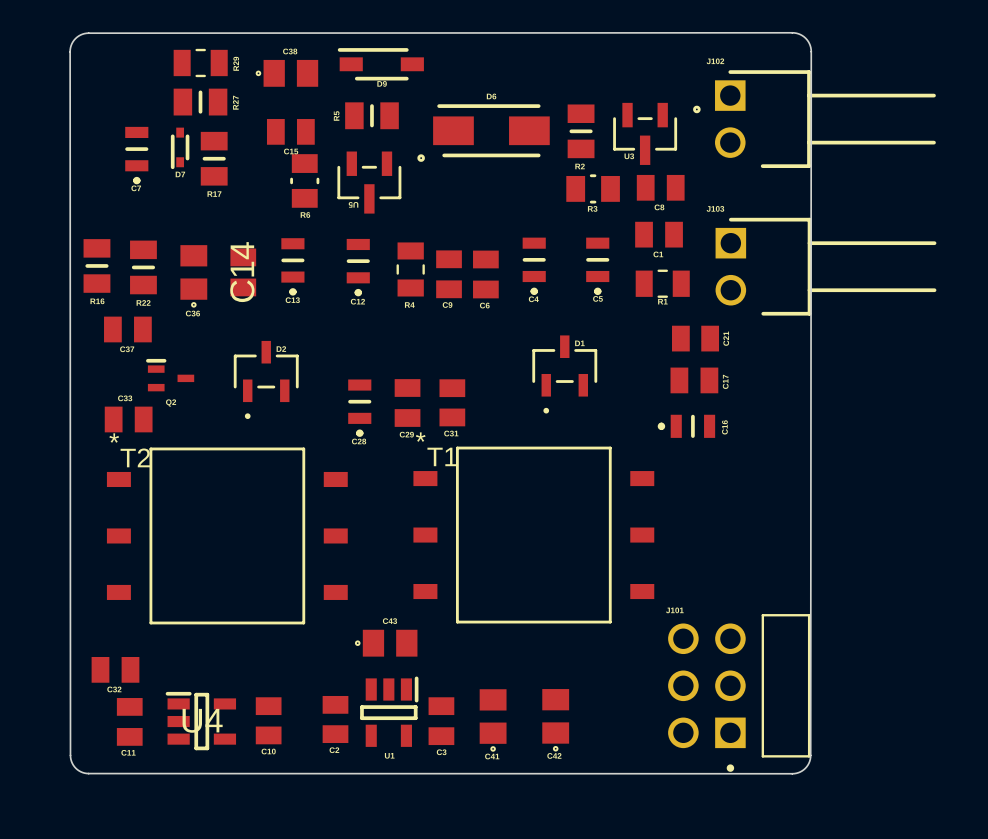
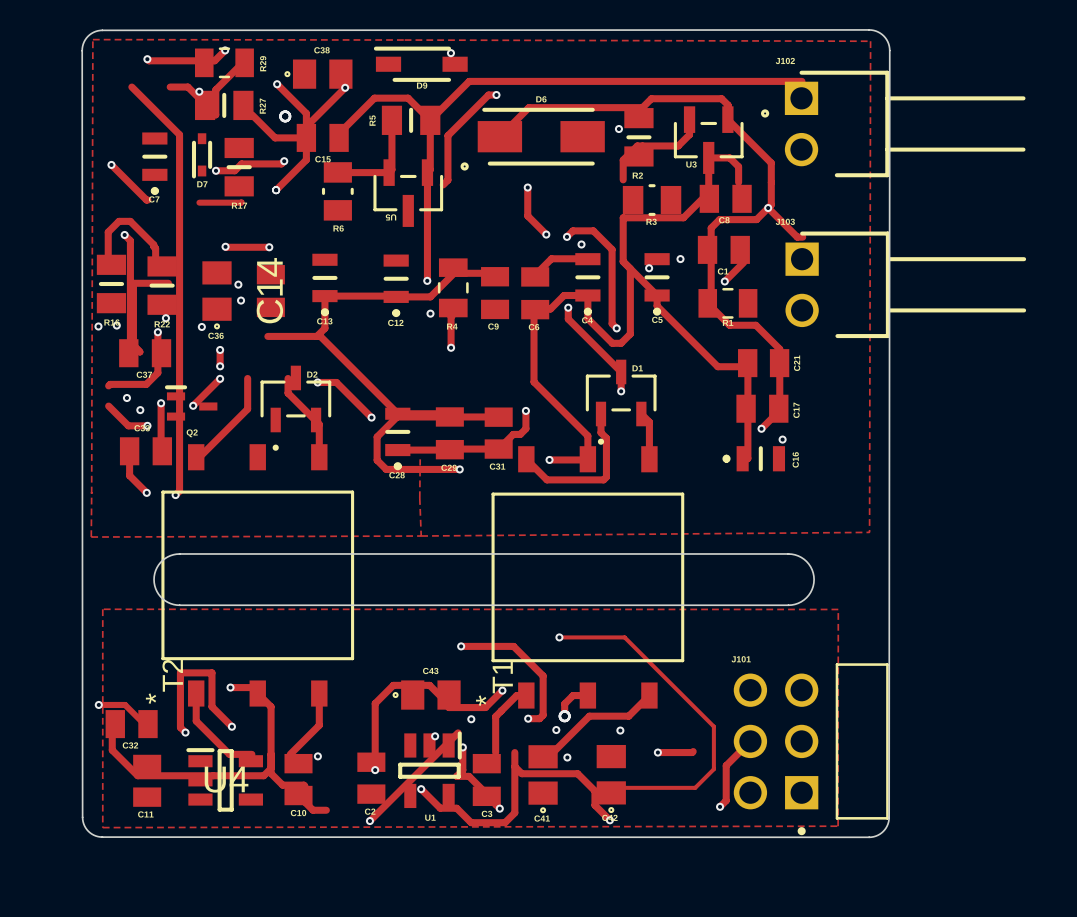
track: none -> (225, 50) (214, 60) (148, 60) (147, 59)
via: none -> (225, 50)
via: none -> (450, 53)
via: none -> (147, 59)
track: none -> (244, 60) (215, 89) (215, 114) (187, 87) (170, 87)
track: none -> (801, 81) (469, 81) (430, 120)
track: none -> (277, 84) (306, 113) (306, 159) (276, 190)
via: none -> (277, 84)
track: none -> (131, 87) (179, 134) (179, 491) (175, 495)
track: none -> (345, 87) (306, 126)
via: none -> (345, 87)
via: none -> (199, 91)
track: none -> (496, 95) (488, 95) (447, 135) (447, 180) (443, 184)
via: none -> (496, 95)
track: none -> (728, 105) (721, 98) (651, 98) (642, 107) (528, 107) (499, 136)
track: none -> (727, 105) (727, 119) (771, 163) (771, 204) (756, 219) (719, 219) (711, 228) (711, 299) (707, 303) (729, 325) (755, 325) (779, 349) (780, 409) (761, 428)
track: none -> (252, 114) (275, 137) (306, 137)
via: none -> (285, 116)
track: none -> (391, 120) (391, 169) (389, 172) (338, 172)
track: none -> (430, 120) (430, 169) (427, 172) (427, 280)
track: none -> (430, 120) (408, 98) (374, 98) (339, 133) (339, 137)
track: none -> (689, 119) (689, 134) (678, 145) (637, 145) (623, 160) (623, 179)
via: none -> (618, 129)
track: none -> (284, 161) (281, 163) (241, 163) (234, 170) (215, 170)
via: none -> (284, 161)
track: none -> (111, 164) (147, 200)
via: none -> (111, 164)
via: none -> (215, 170)
track: none -> (738, 182) (738, 166) (729, 157) (708, 157) (708, 192) (683, 217) (623, 217) (623, 261) (657, 295) (657, 305) (717, 366) (747, 366) (747, 458)
track: none -> (527, 187) (527, 215) (546, 234)
via: none -> (527, 187)
via: none -> (276, 190)
track: none -> (241, 202) (199, 202)
track: none -> (768, 208) (797, 237) (802, 237)
via: none -> (768, 208)
track: none -> (124, 234) (130, 240) (130, 342) (139, 352)
via: none -> (124, 234)
via: none -> (546, 234)
track: none -> (566, 236) (573, 230) (593, 230) (612, 249) (612, 323) (616, 328)
via: none -> (566, 236)
via: none -> (581, 244)
track: none -> (225, 246) (269, 247)
via: none -> (225, 246)
via: none -> (269, 247)
track: none -> (587, 258) (551, 258) (534, 276)
via: none -> (680, 259)
track: none -> (743, 262) (724, 281)
track: none -> (108, 264) (108, 232) (119, 221) (130, 221) (153, 244) (155, 265)
track: none -> (630, 268) (630, 334) (621, 343) (612, 343) (587, 318) (587, 295) (564, 295) (550, 309) (534, 309) (534, 382) (587, 435) (587, 459) (549, 459)
via: none -> (649, 268)
track: none -> (495, 276) (491, 273) (454, 273) (430, 296) (324, 296) (324, 328) (316, 336)
via: none -> (427, 280)
via: none -> (724, 281)
track: none -> (168, 283) (133, 283) (133, 345)
via: none -> (238, 284)
via: none -> (241, 300)
track: none -> (568, 307) (568, 319) (621, 371) (621, 391)
via: none -> (568, 307)
via: none -> (430, 313)
track: none -> (454, 313) (451, 316) (451, 347)
via: none -> (165, 318)
via: none -> (98, 326)
via: none -> (116, 325)
via: none -> (201, 326)
via: none -> (616, 328)
track: none -> (157, 332) (157, 372) (146, 384) (108, 385)
via: none -> (157, 332)
track: none -> (267, 336) (320, 336) (397, 413) (446, 413) (449, 416)
via: none -> (451, 347)
track: none -> (220, 349) (220, 366)
via: none -> (220, 349)
via: none -> (220, 366)
track: none -> (247, 378) (247, 409) (199, 457) (196, 457)
track: none -> (288, 378) (288, 393) (319, 424) (319, 457)
track: none -> (220, 378) (193, 405)
via: none -> (220, 378)
track: none -> (317, 382) (336, 382) (371, 417)
via: none -> (317, 382)
via: none -> (621, 391)
via: none -> (126, 398)
track: none -> (161, 403) (162, 451)
via: none -> (161, 403)
via: none -> (193, 405)
track: none -> (108, 406) (128, 425) (147, 425)
via: none -> (140, 410)
track: none -> (525, 410) (525, 428) (520, 434) (513, 434) (498, 449) (397, 450)
via: none -> (525, 410)
track: none -> (601, 414) (601, 432) (606, 438) (606, 477) (603, 479) (546, 479) (526, 459)
track: none -> (641, 414) (649, 422) (649, 459)
via: none -> (371, 417)
track: none -> (498, 416) (397, 416) (377, 436) (377, 460) (386, 469) (459, 469)
via: none -> (147, 425)
via: none -> (761, 428)
via: none -> (782, 439)
track: none -> (129, 451) (129, 475) (146, 492)
zone outline: none -> (420, 459) (421, 536)
via: none -> (549, 459)
via: none -> (459, 469)
via: none -> (146, 492)
via: none -> (175, 495)
zone outline: none -> (421, 536) (91, 537) (92, 39) (870, 41) (869, 532) (421, 536)
board edge: none -> (179, 553) (788, 553) (798, 555) (806, 561) (812, 569) (814, 579) (812, 589) (806, 597) (798, 603) (788, 605) (179, 605) (170, 603) (160, 596) (155, 588) (154, 579) (155, 570) (160, 562) (170, 555) (179, 553)
T2 rotation: 0° (227, 535) -> 90° counterclockwise (257, 575)
T1 rotation: 0° (533, 535) -> 90° counterclockwise (587, 577)
zone outline: none -> (102, 609) (102, 827) (838, 826) (838, 609) (102, 609)
track: none -> (559, 637) (624, 637) (713, 726) (713, 769) (695, 787) (625, 787)
via: none -> (559, 637)
track: none -> (461, 646) (513, 646) (543, 675) (543, 715) (539, 718) (528, 718)
via: none -> (461, 646)
track: none -> (230, 687) (251, 687) (271, 706) (271, 773) (282, 785) (303, 785) (304, 801) (313, 810) (326, 810)
via: none -> (230, 687)
track: none -> (502, 690) (485, 707) (448, 707) (448, 704) (429, 685) (393, 685) (375, 703) (375, 770)
via: none -> (502, 690)
track: none -> (196, 693) (196, 721) (229, 754) (251, 754)
track: none -> (319, 693) (319, 725) (290, 754)
track: none -> (526, 695) (516, 695) (495, 716) (495, 752)
track: none -> (587, 695) (573, 695) (564, 703) (564, 716)
track: none -> (649, 695) (628, 716) (589, 716) (553, 752) (534, 752)
track: none -> (98, 704) (125, 704) (144, 724) (144, 729)
via: none -> (98, 704)
via: none -> (564, 716)
via: none -> (528, 718)
via: none -> (471, 719)
track: none -> (231, 726) (211, 706) (211, 672) (180, 672) (180, 727) (185, 732)
via: none -> (231, 726)
track: none -> (112, 729) (112, 750) (137, 775) (263, 775) (271, 768)
via: none -> (556, 730)
via: none -> (620, 730)
via: none -> (185, 732)
track: none -> (458, 732) (369, 821)
via: none -> (435, 736)
track: none -> (750, 741) (726, 765) (726, 800) (720, 806)
track: none -> (462, 747) (462, 770) (456, 776) (469, 776) (499, 808)
via: none -> (462, 747)
track: none -> (514, 752) (514, 812) (505, 822) (471, 822) (456, 808) (440, 808) (421, 789)
via: none -> (657, 752)
track: none -> (693, 751) (657, 752)
via: none -> (317, 756)
via: none -> (567, 757)
track: none -> (514, 766) (521, 773) (577, 773) (594, 790) (594, 805) (609, 820)
via: none -> (375, 770)
via: none -> (421, 789)
via: none -> (720, 806)
via: none -> (499, 808)
via: none -> (369, 821)
via: none -> (609, 820)

